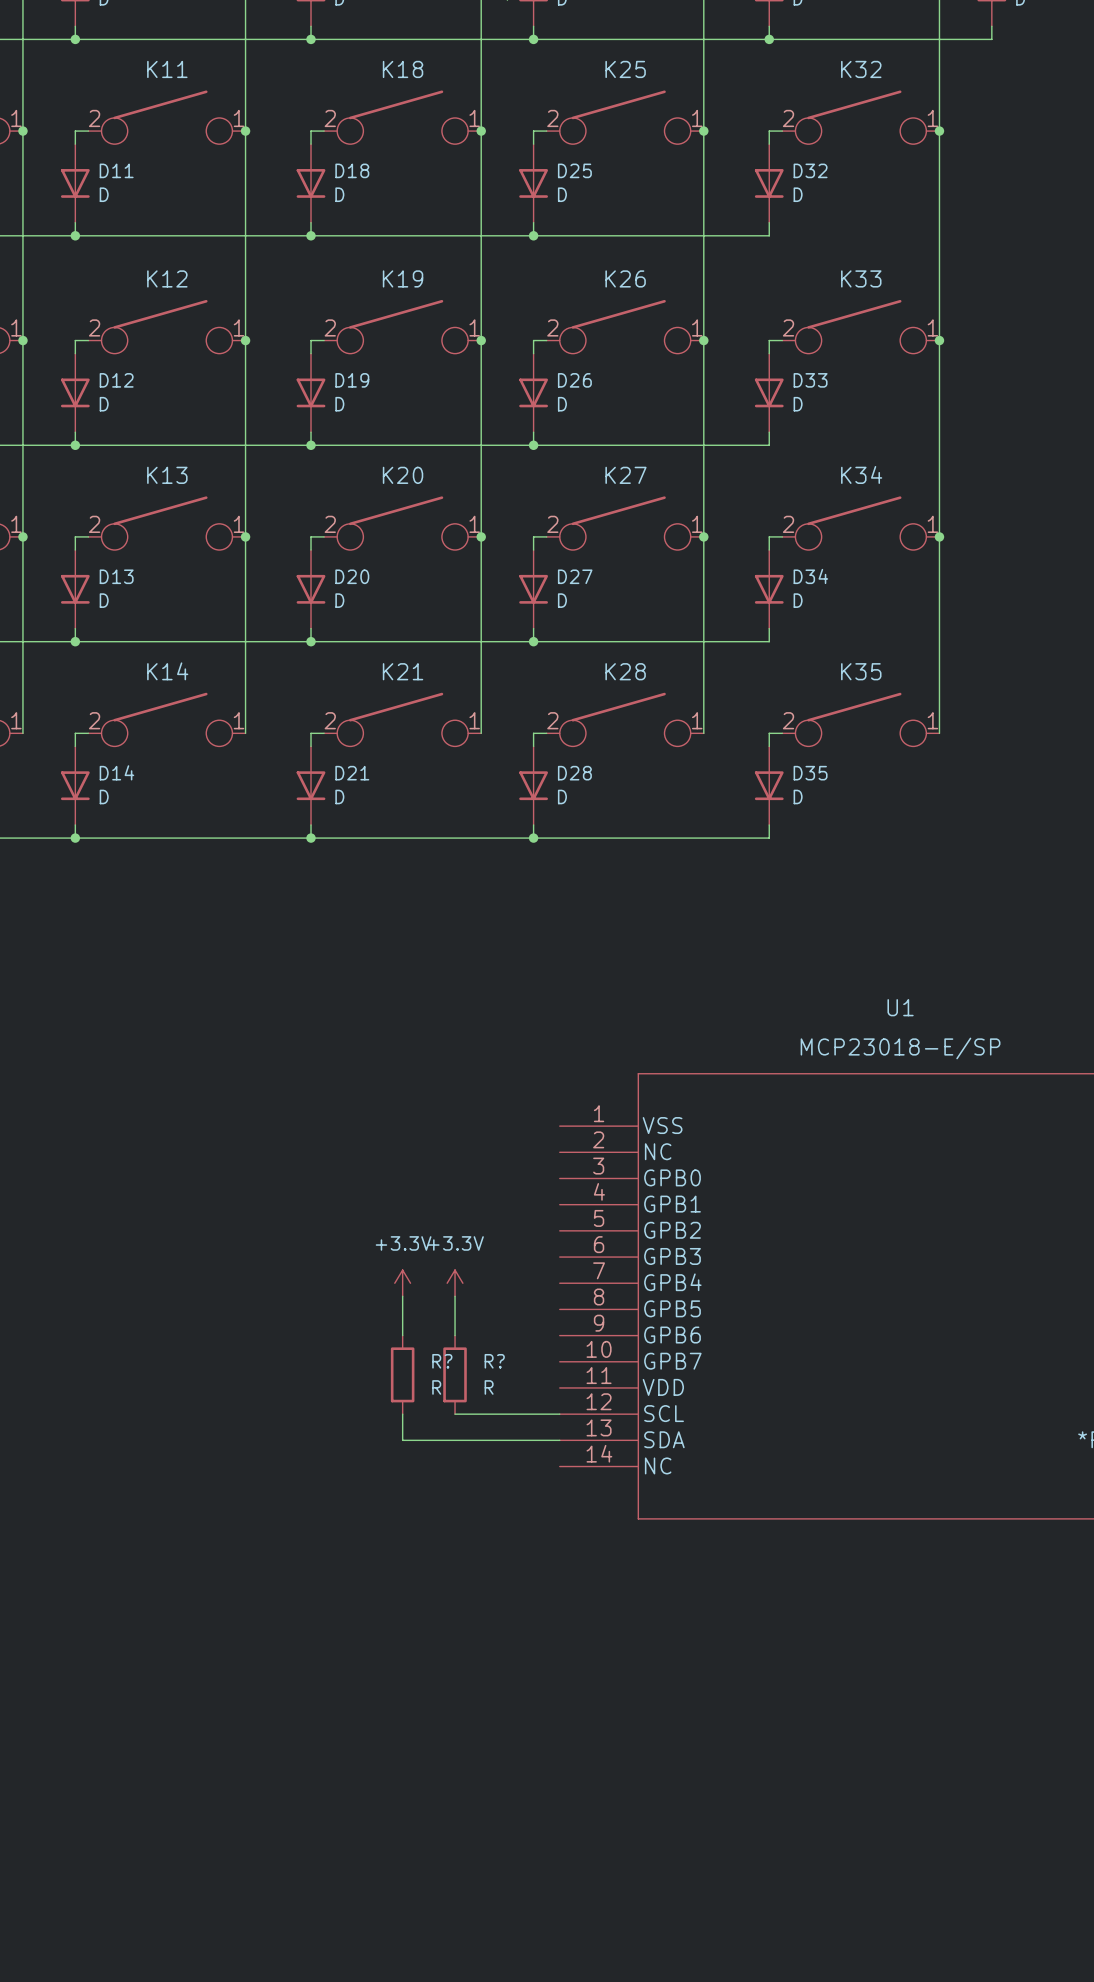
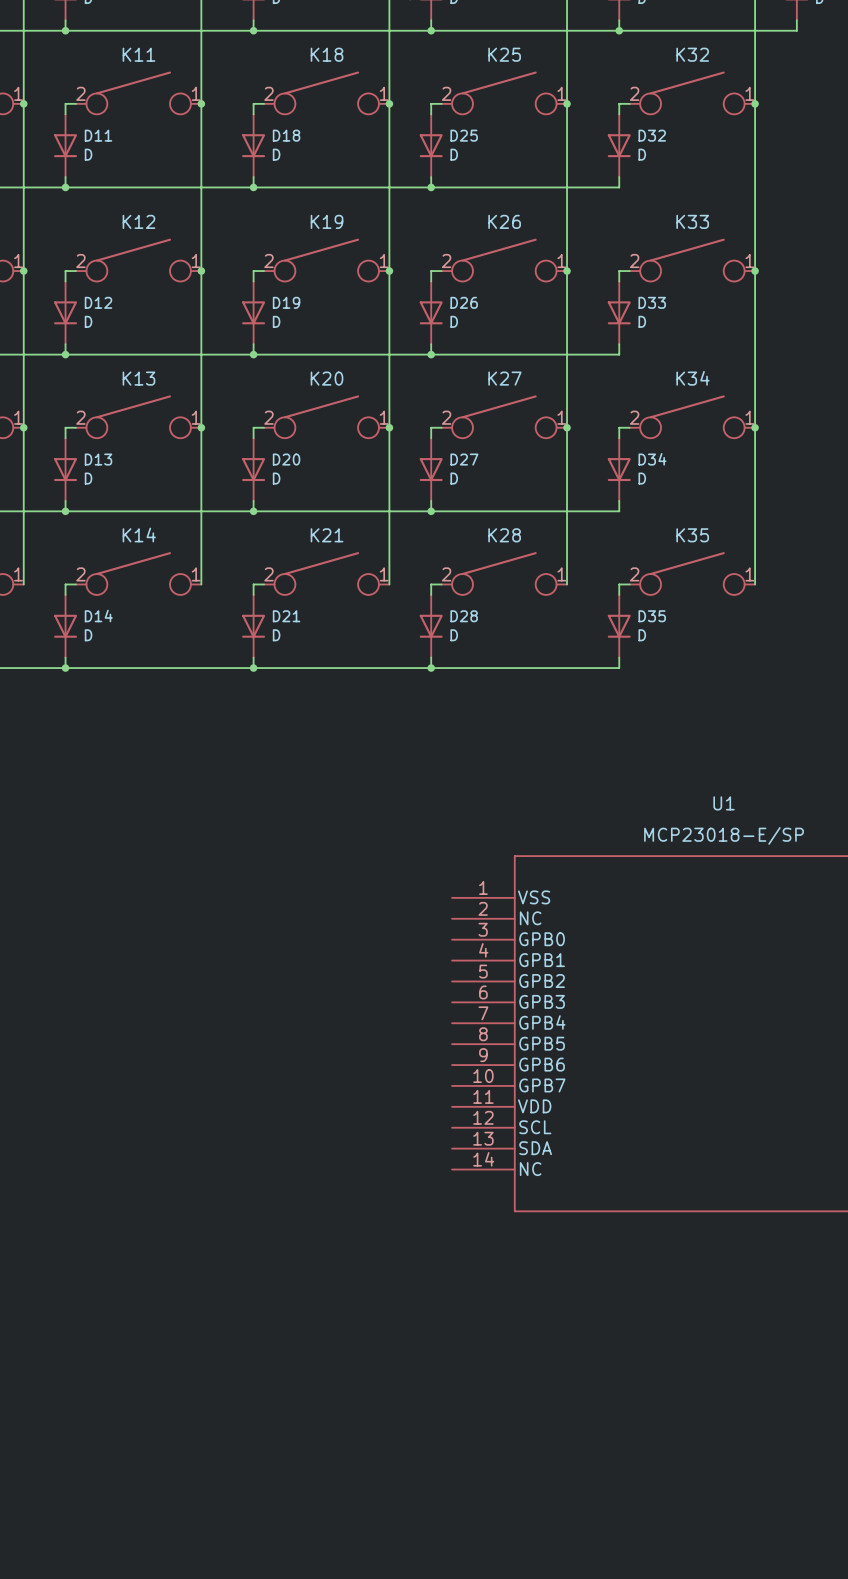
power symbol: +3.3V (402, 1283) -> none
power symbol: +3.3V (455, 1283) -> none
wire: (402, 1296) (402, 1335) -> none
wire: (455, 1296) (455, 1335) -> none
R?: R (402, 1374) -> none
R?: R (455, 1374) -> none
wire: (402, 1414) (402, 1440) (559, 1440) -> none
wire: (455, 1414) (559, 1414) -> none

